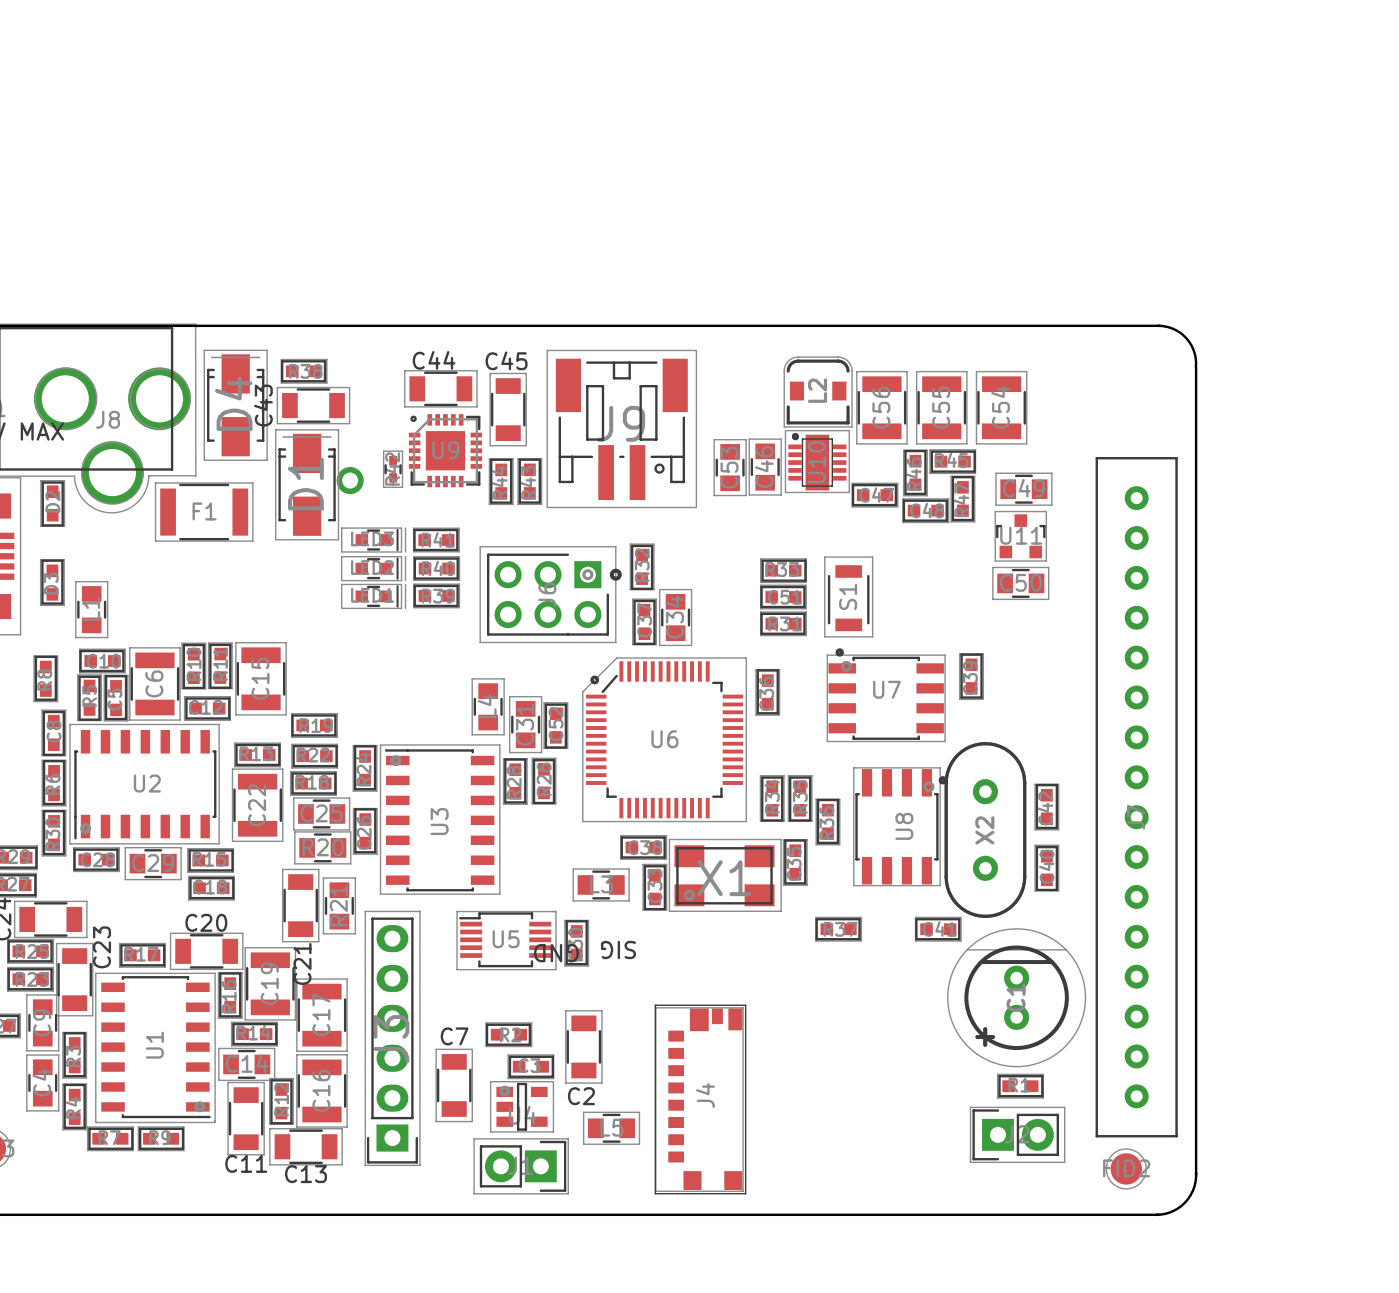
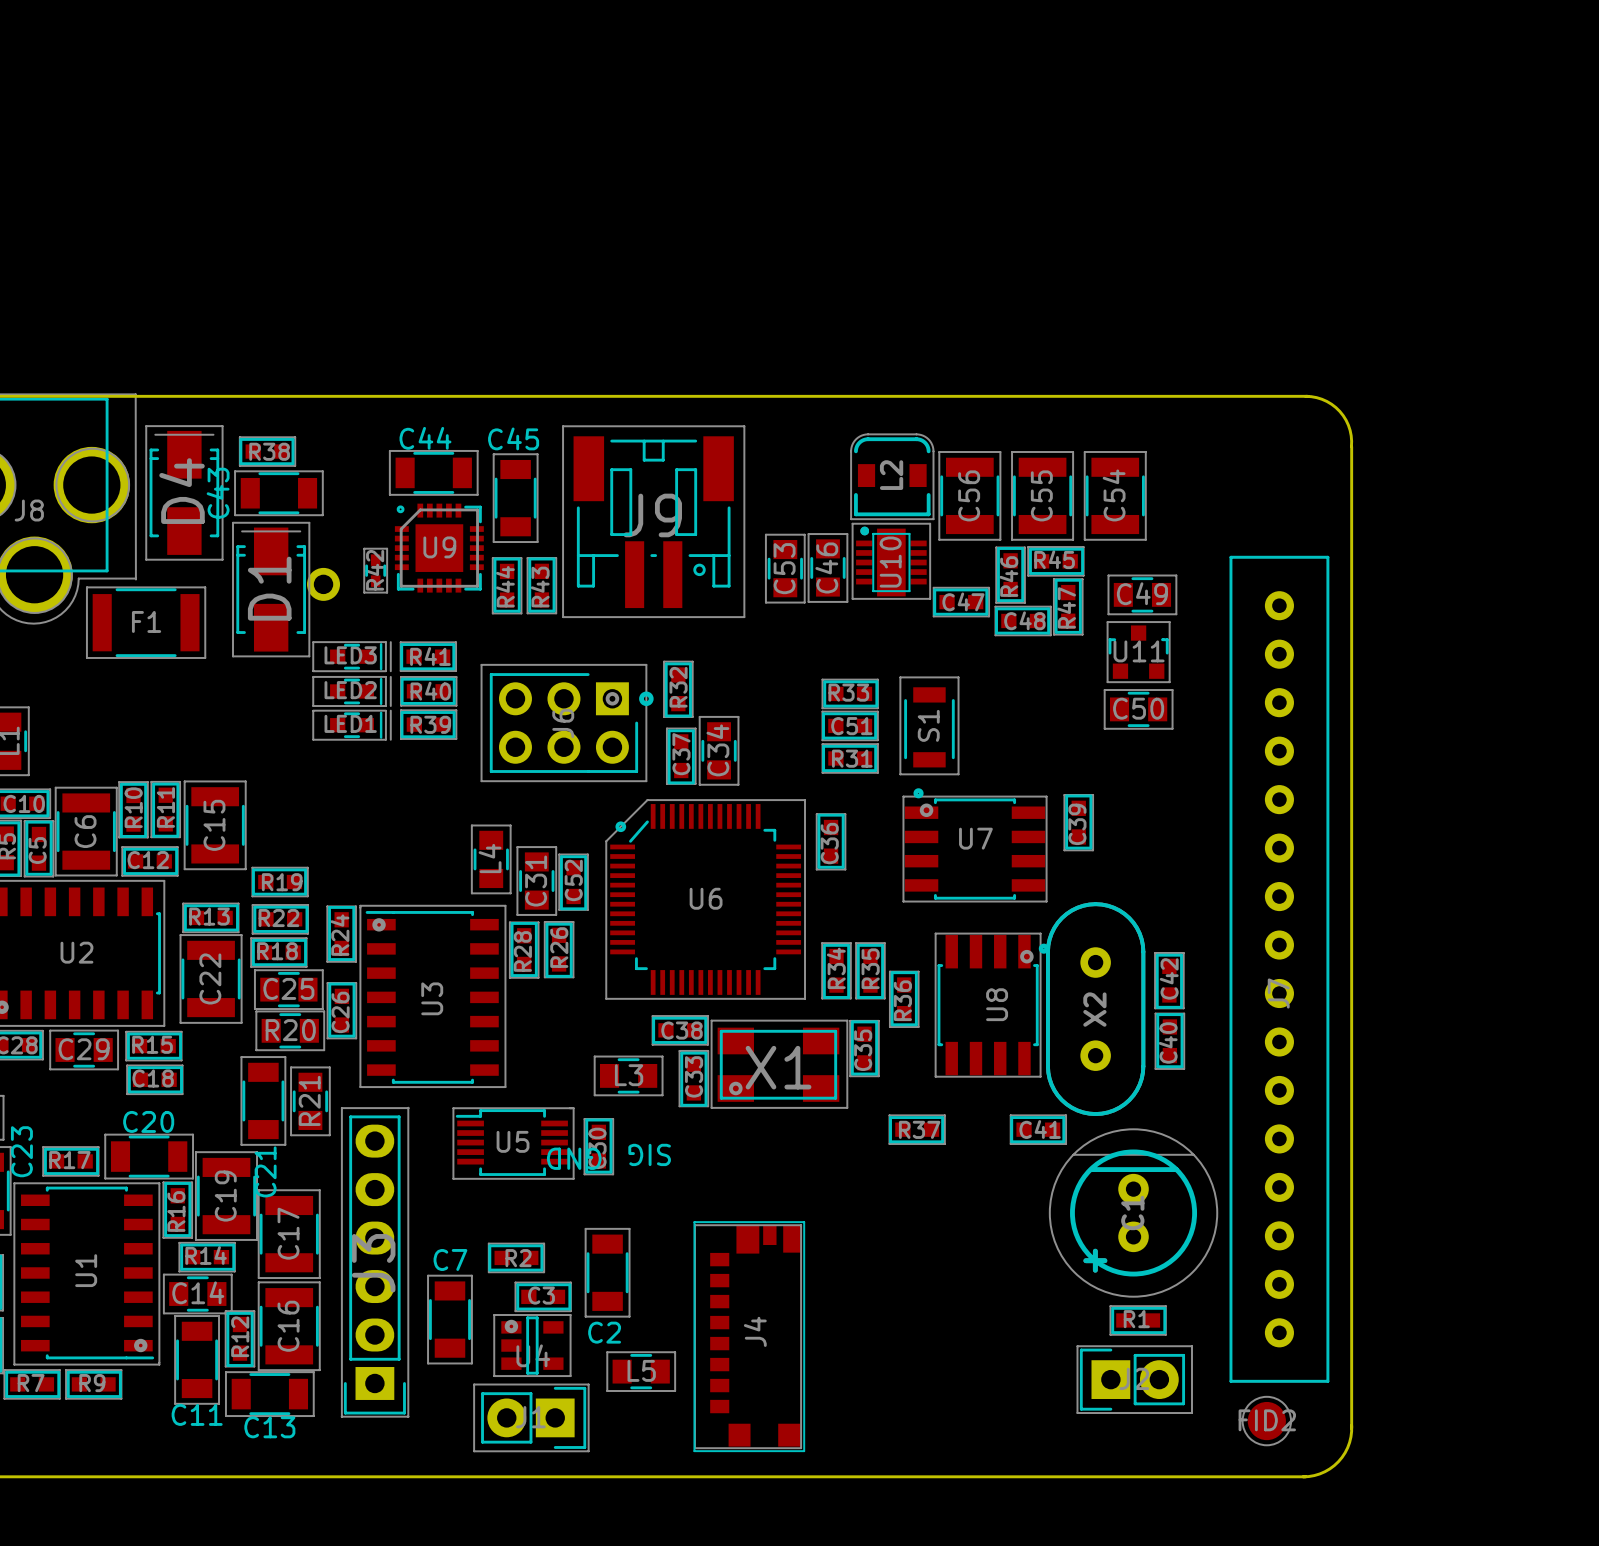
C42 rotation: 0° (1046, 807) -> 180° (1169, 980)
C40 rotation: 0° (1046, 868) -> 180° (1169, 1041)

